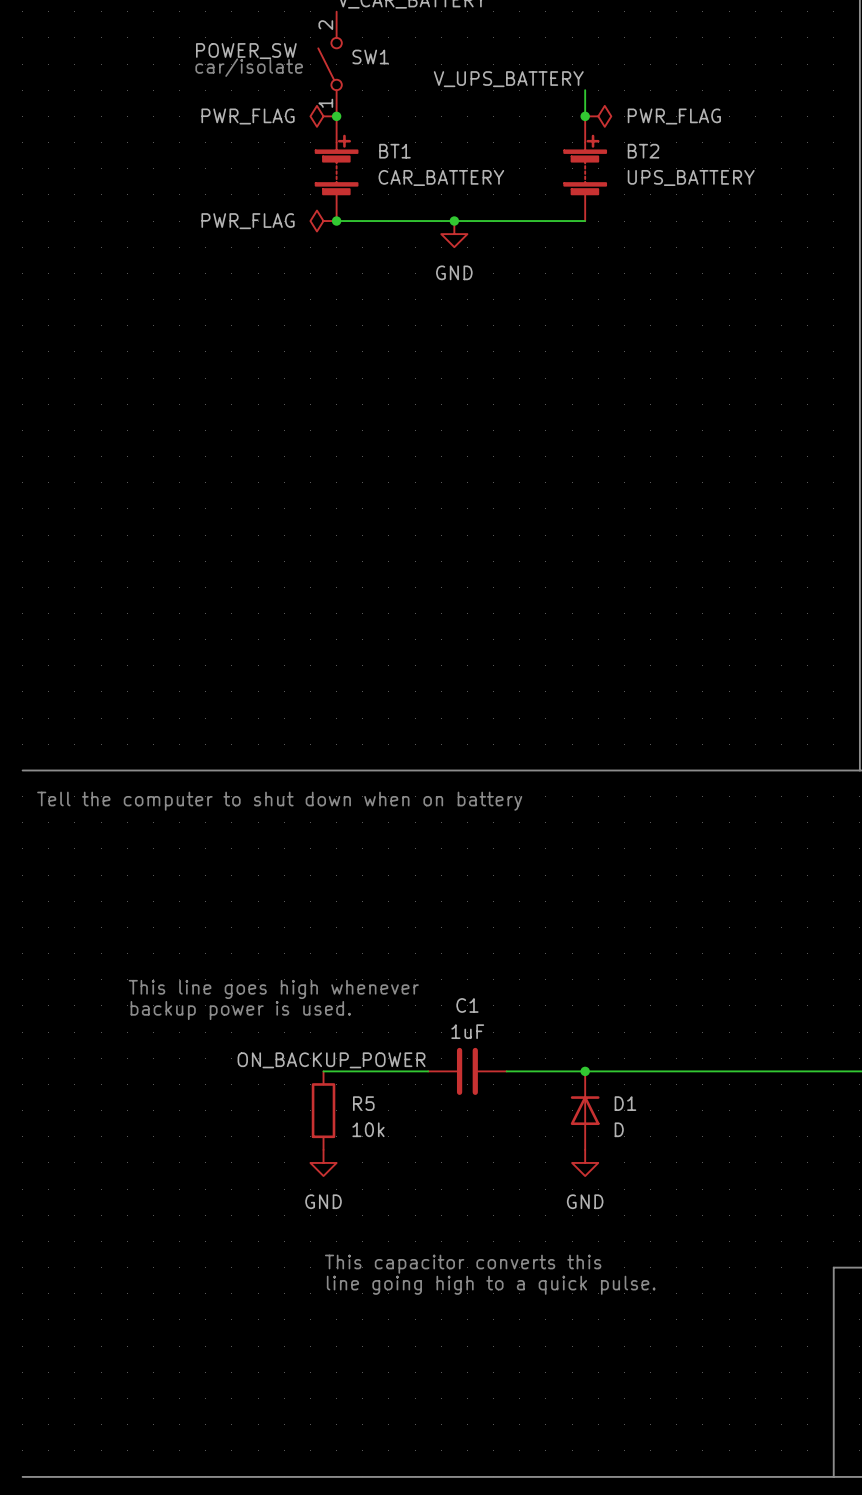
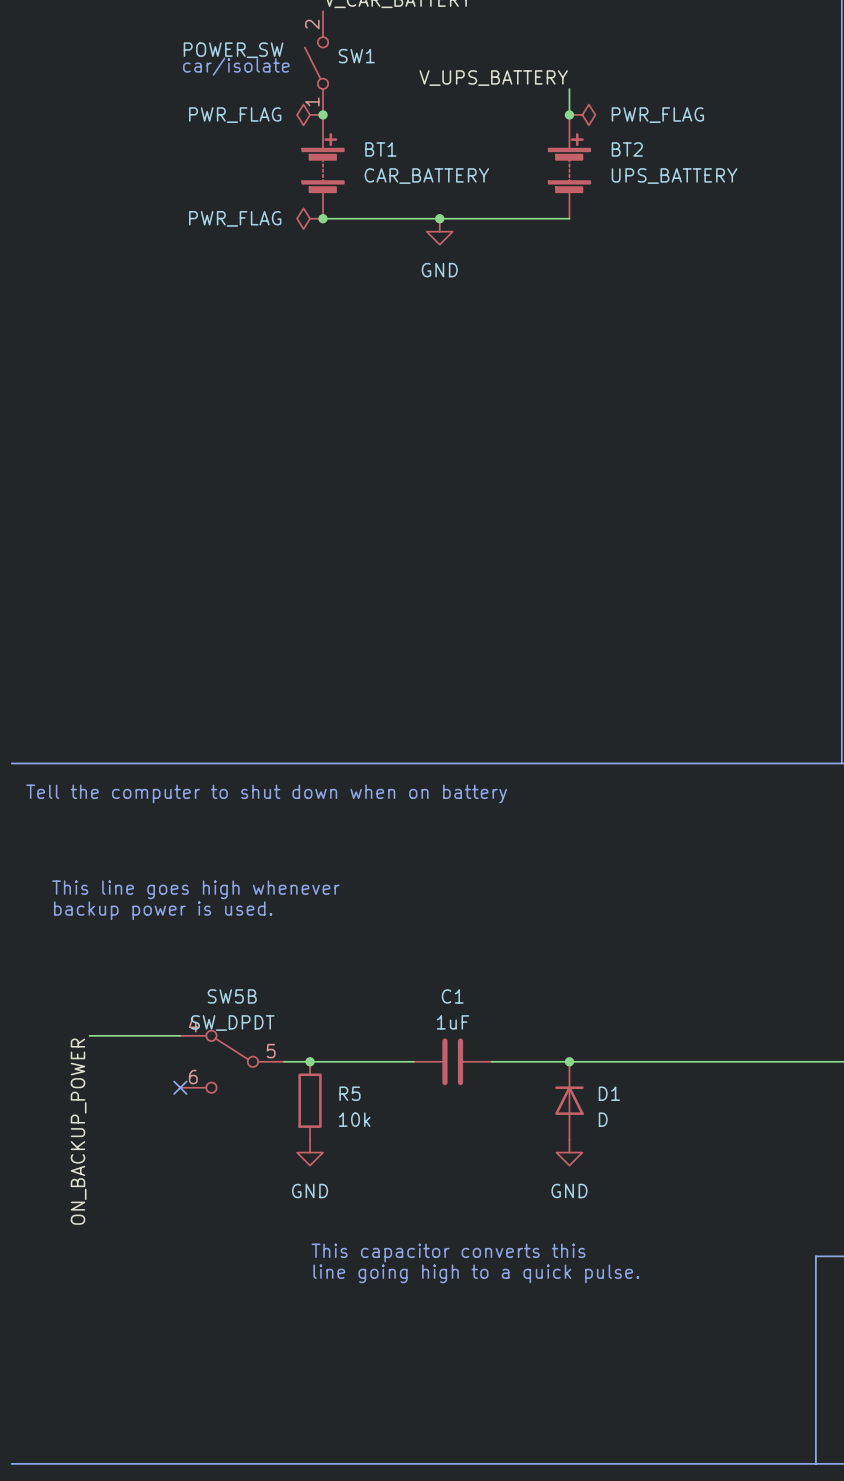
text position: This line goes high whenever (273, 989) -> This line goes high whenever (195, 889)
text position: backup power is used. (240, 1010) -> backup power is used. (163, 910)
wire: none -> (89, 1035) (180, 1035)
label: ON_BACKUP_POWER (331, 1060) -> none
SW5B: none -> SW_DPDT (232, 1061)
wire: none -> (284, 1061) (310, 1061)
junction: none -> (310, 1061)
no-connect mark: none -> (180, 1087)
label: none -> ON_BACKUP_POWER (78, 1131)

